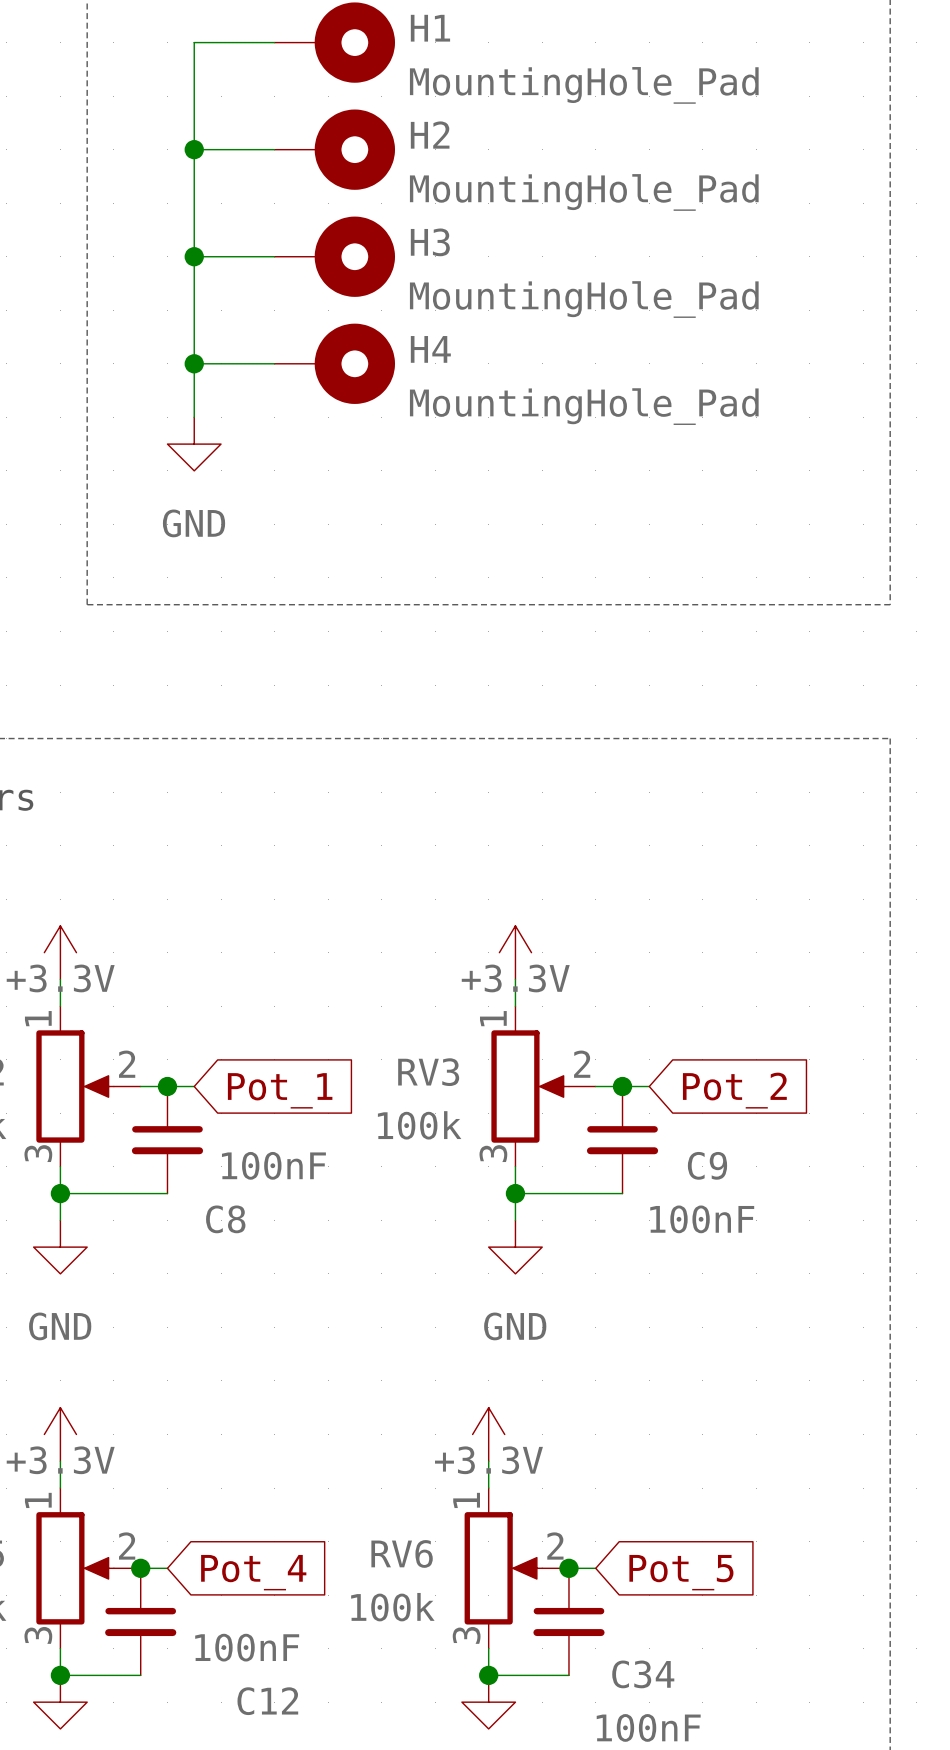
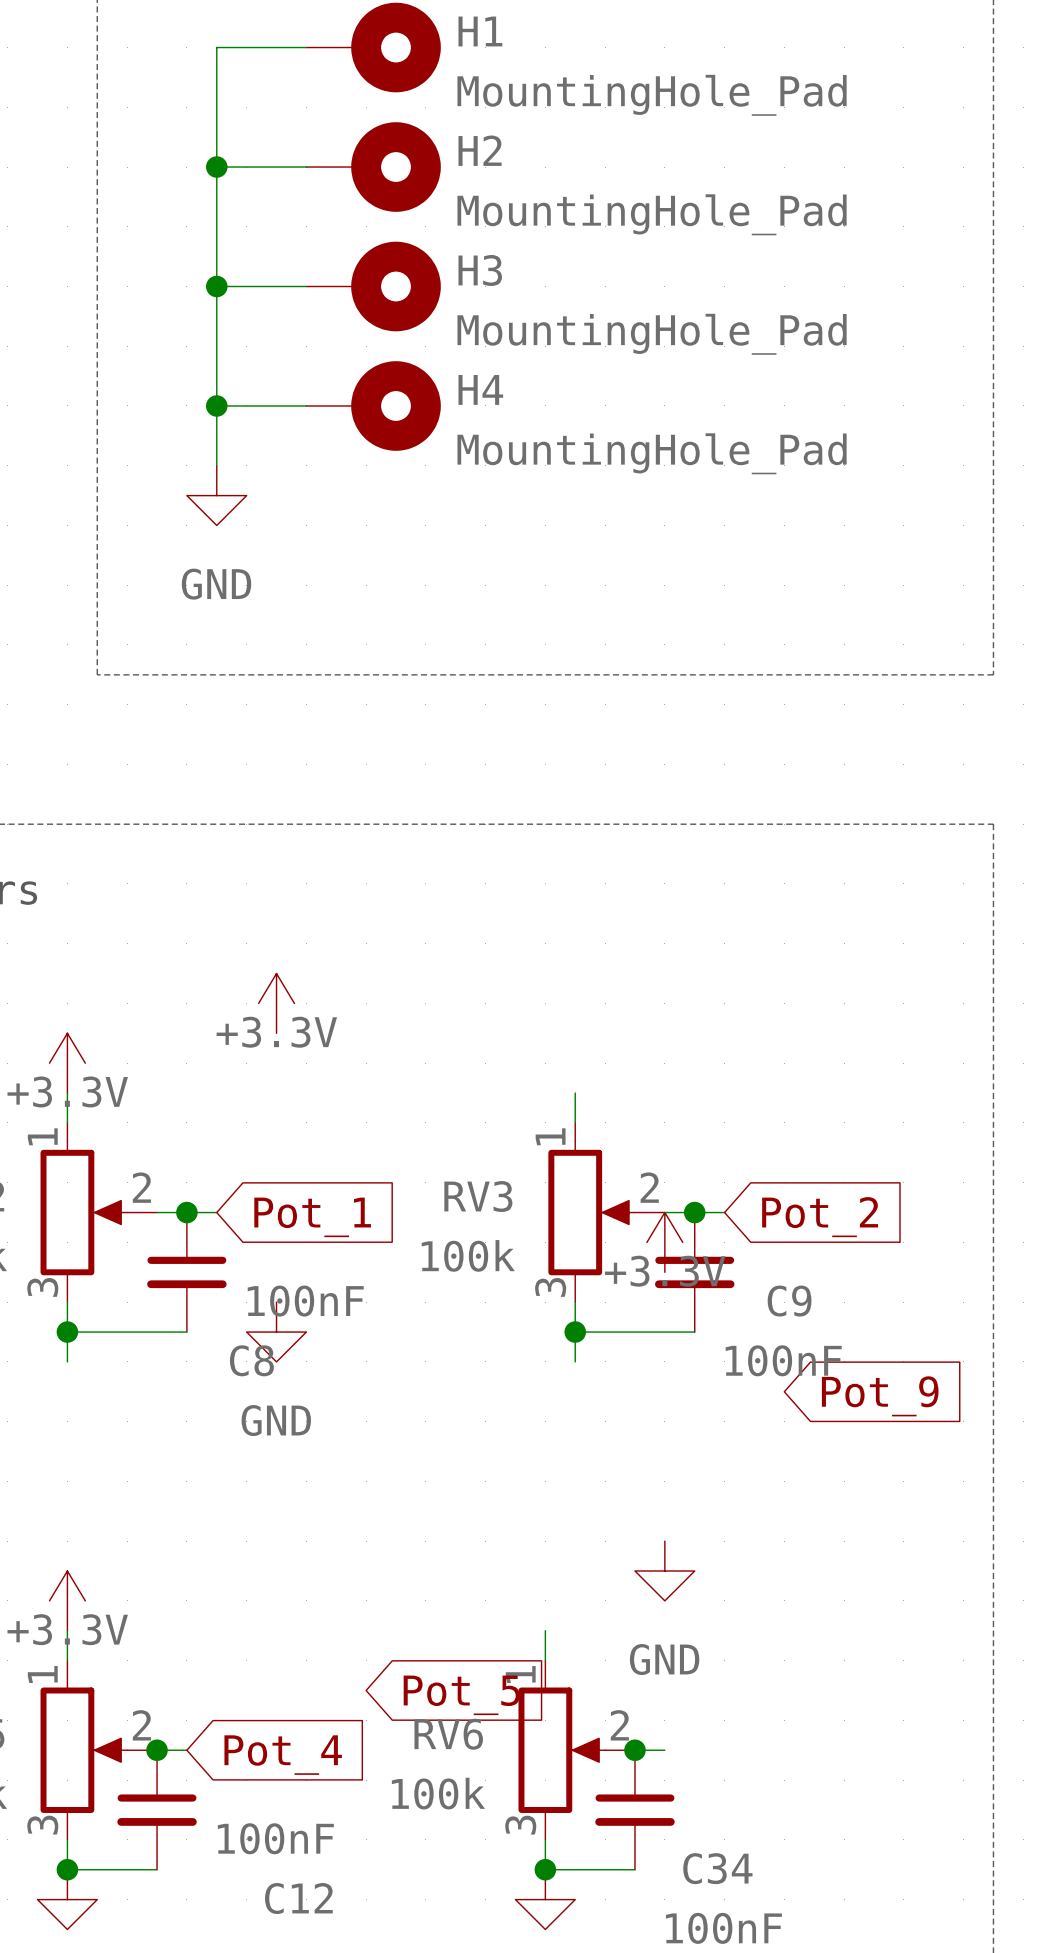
power symbol: none -> +3.3V (276, 1003)
power symbol: +3.3V (515, 952) -> none
power symbol: none -> +3.3V (664, 1242)
power symbol: none -> GND (276, 1332)
power symbol: GND (60, 1247) -> none
power symbol: GND (515, 1247) -> none
global label: none -> Pot_9 (880, 1396)
power symbol: none -> GND (664, 1571)
power symbol: +3.3V (488, 1434) -> none
global label position: Pot_5 (681, 1572) -> Pot_5 (461, 1695)

